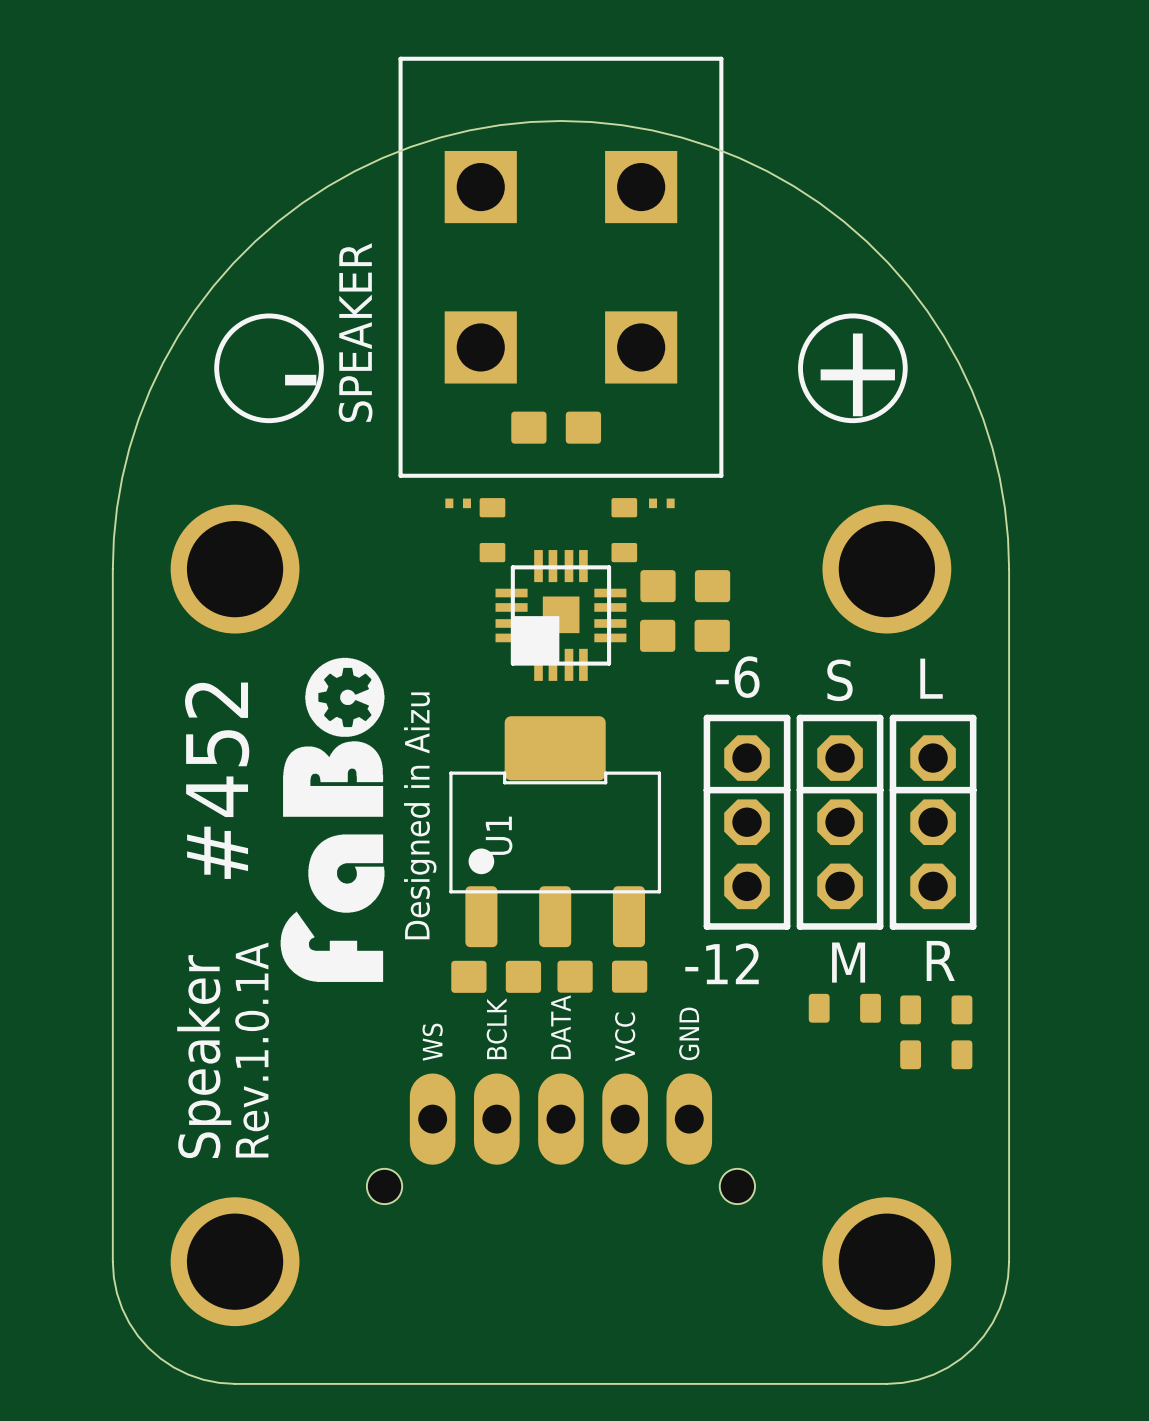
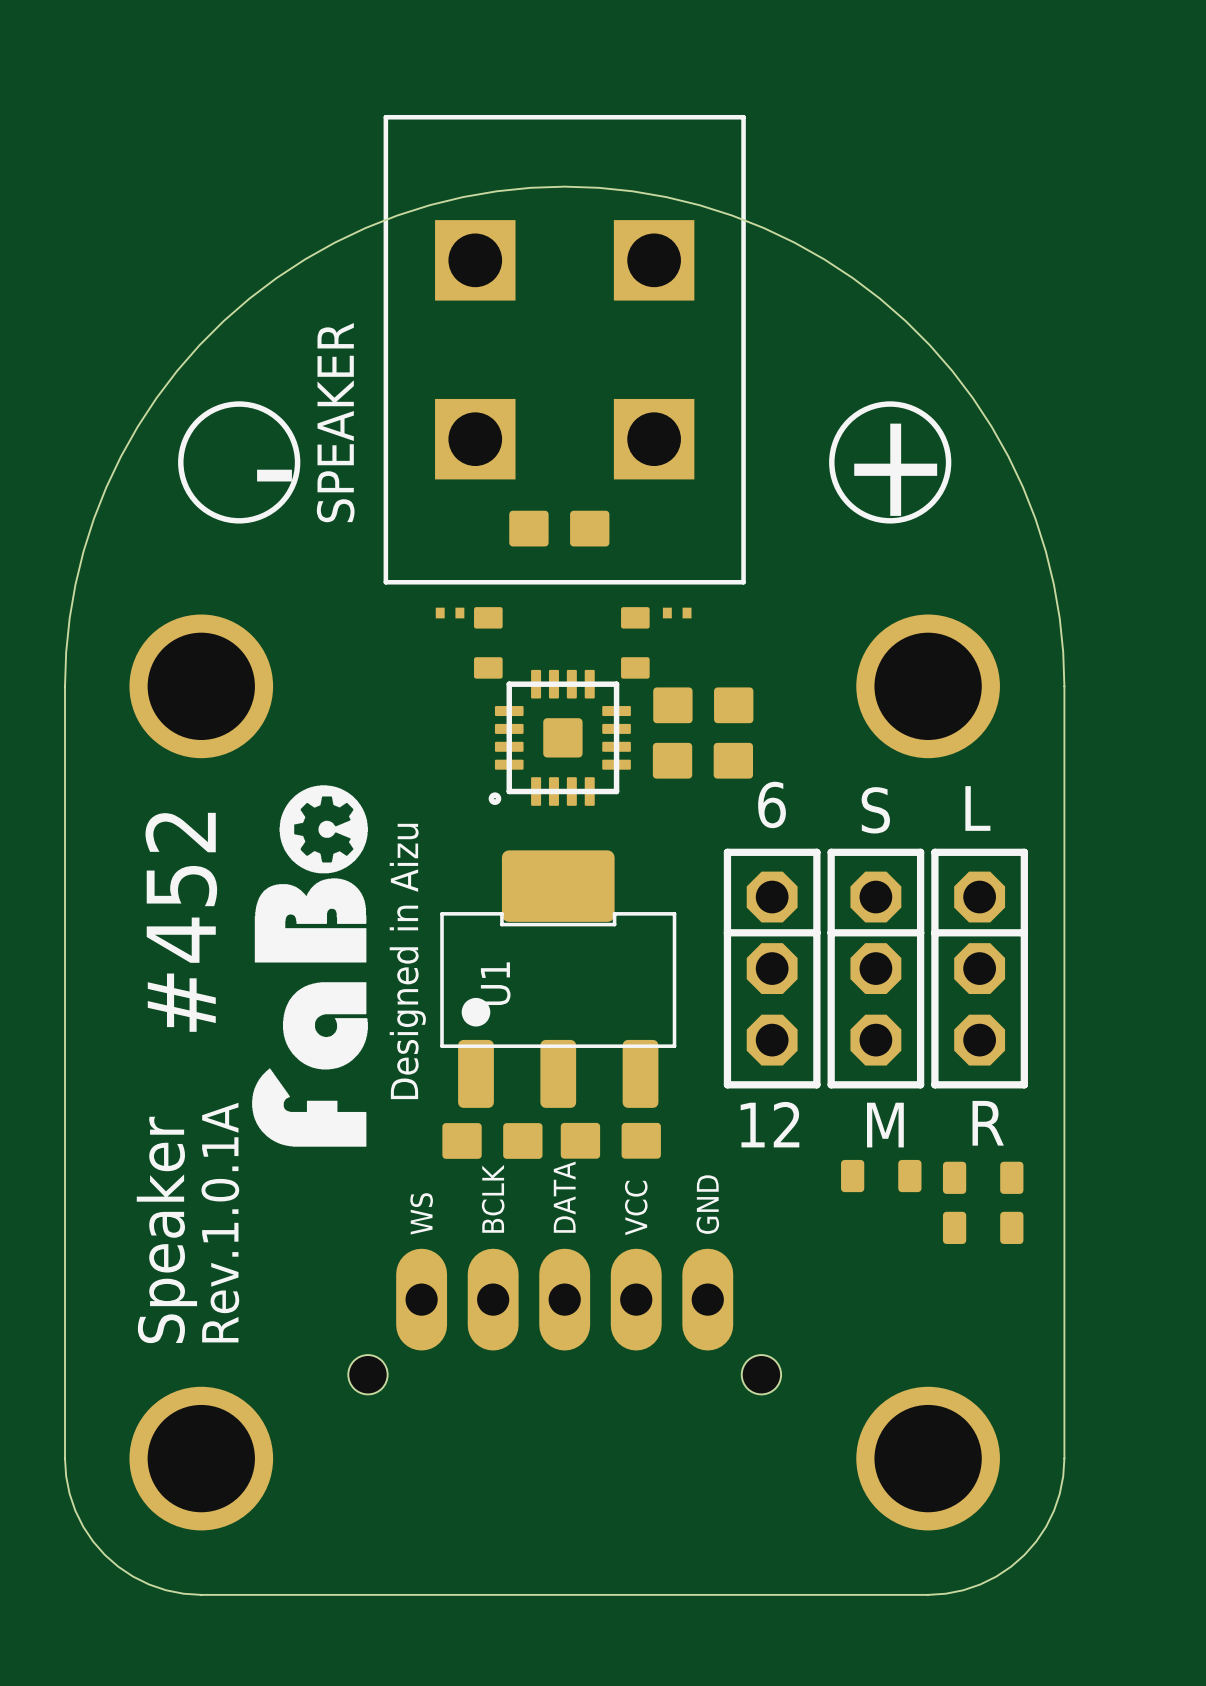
part footprint: [495, 550, 627, 681] -> [488, 669, 631, 806]
text: -6 (737, 677) -> 6 (772, 804)
text: -12 (722, 963) -> 12 (769, 1124)

